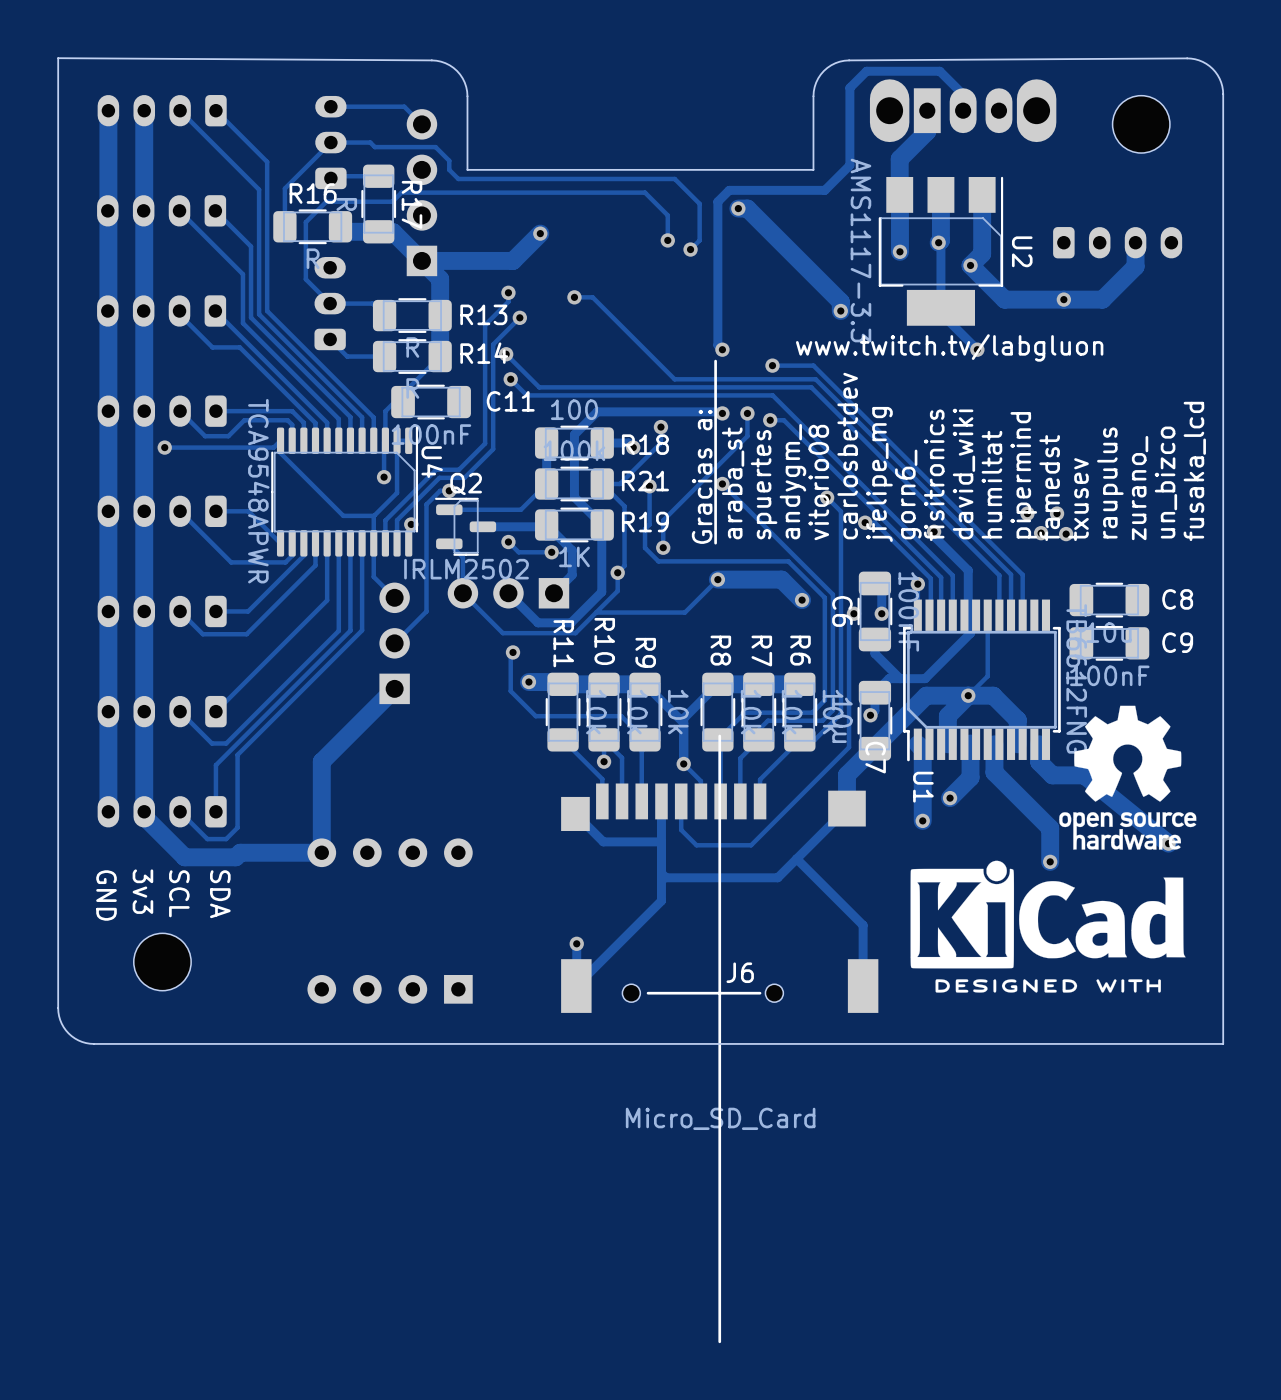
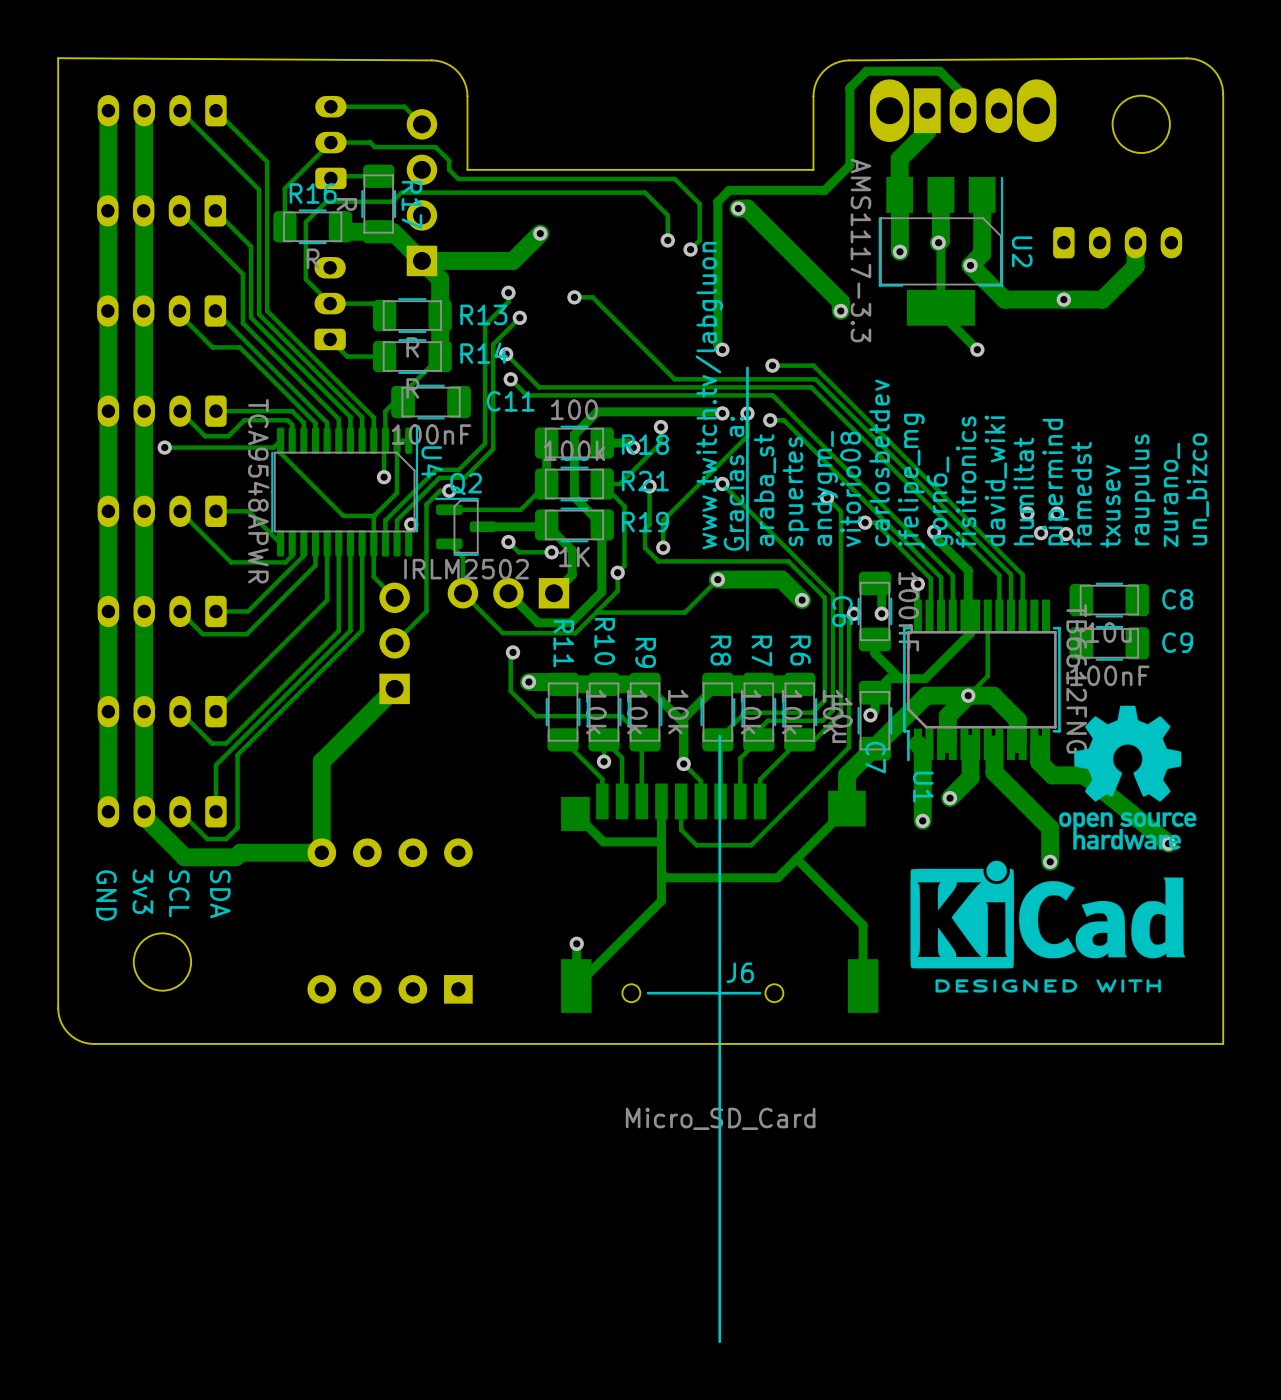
text rotation: 0° (949, 347) -> 90° counterclockwise (709, 395)
line: (715, 361) (715, 543) -> (747, 367) (747, 550)
text position: carlosbetdev (847, 456) -> carlosbetdev (879, 462)
text: fusaka_lcd (1194, 471) -> none
text position: david_wiki (963, 473) -> david_wiki (995, 480)
text position: jfelipe_mg (879, 474) -> jfelipe_mg (911, 481)
text position: fisitronics (934, 475) -> fisitronics (966, 482)
text position: pipermind (1023, 475) -> pipermind (1055, 482)
text position: Gracias a: (702, 476) -> Gracias a: (734, 483)
text position: andygm_ (792, 481) -> andygm_ (824, 488)
text position: vitorio08 (818, 482) -> vitorio08 (850, 489)
text position: raupulus (1110, 482) -> raupulus (1142, 489)
text position: un_bizco (1165, 482) -> un_bizco (1197, 489)
text position: araba_st (733, 483) -> araba_st (764, 490)
text position: spuertes (764, 484) -> spuertes (795, 491)
text position: humiltat (991, 484) -> humiltat (1023, 491)
text position: famedst (1049, 488) -> famedst (1081, 494)
text position: zurano_ (1140, 488) -> zurano_ (1171, 494)
text position: gorn6_ (908, 494) -> gorn6_ (940, 501)
text position: txusev (1078, 499) -> txusev (1110, 506)

